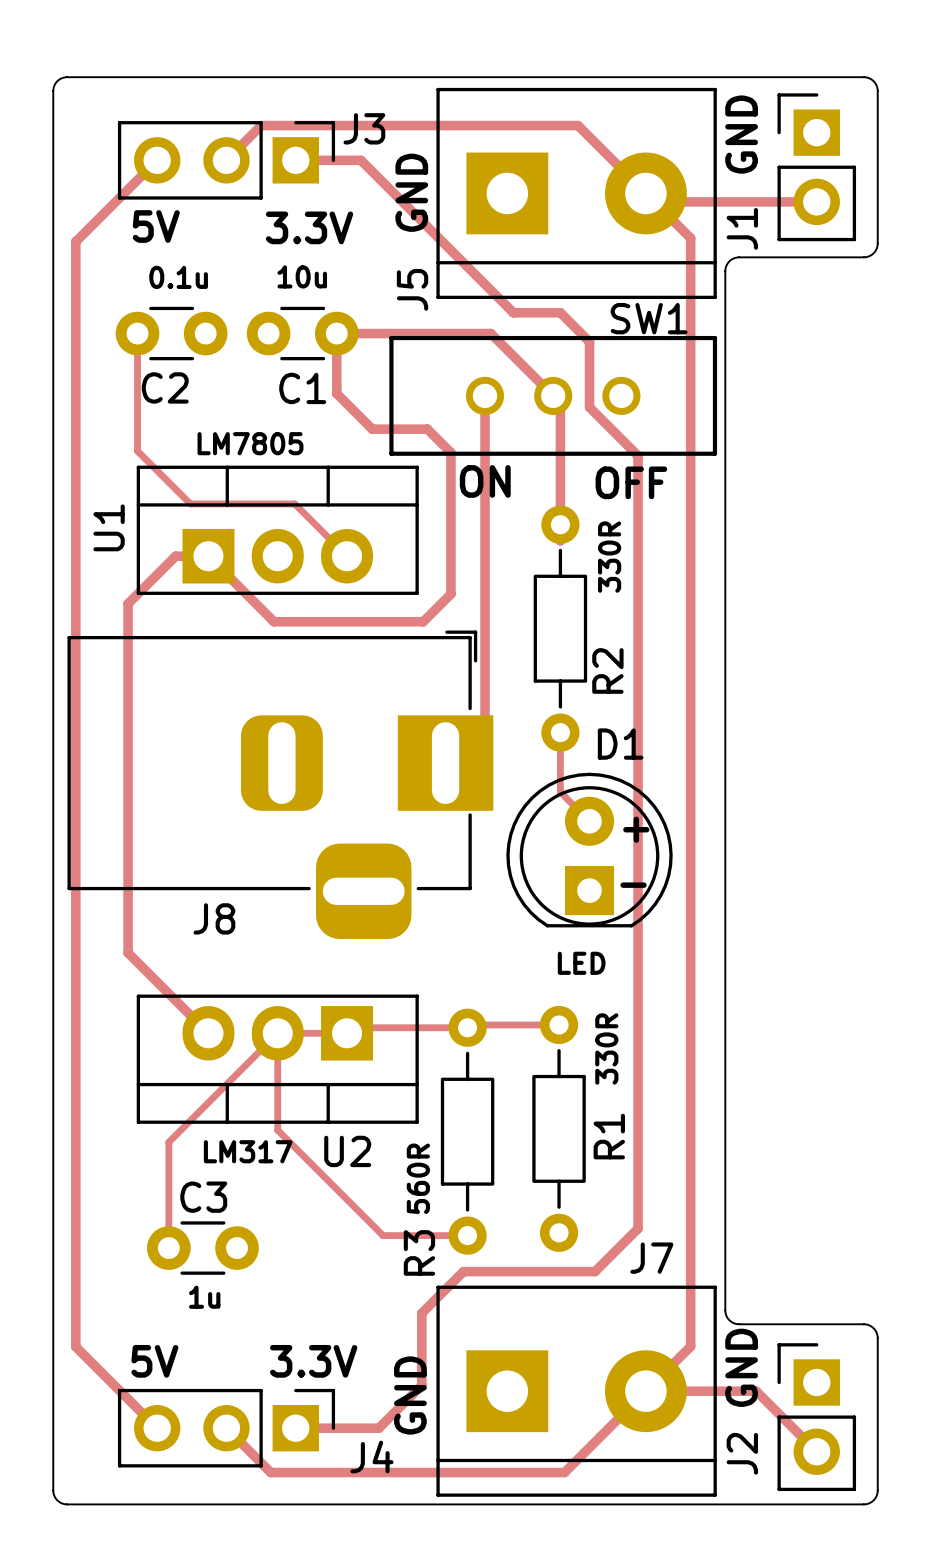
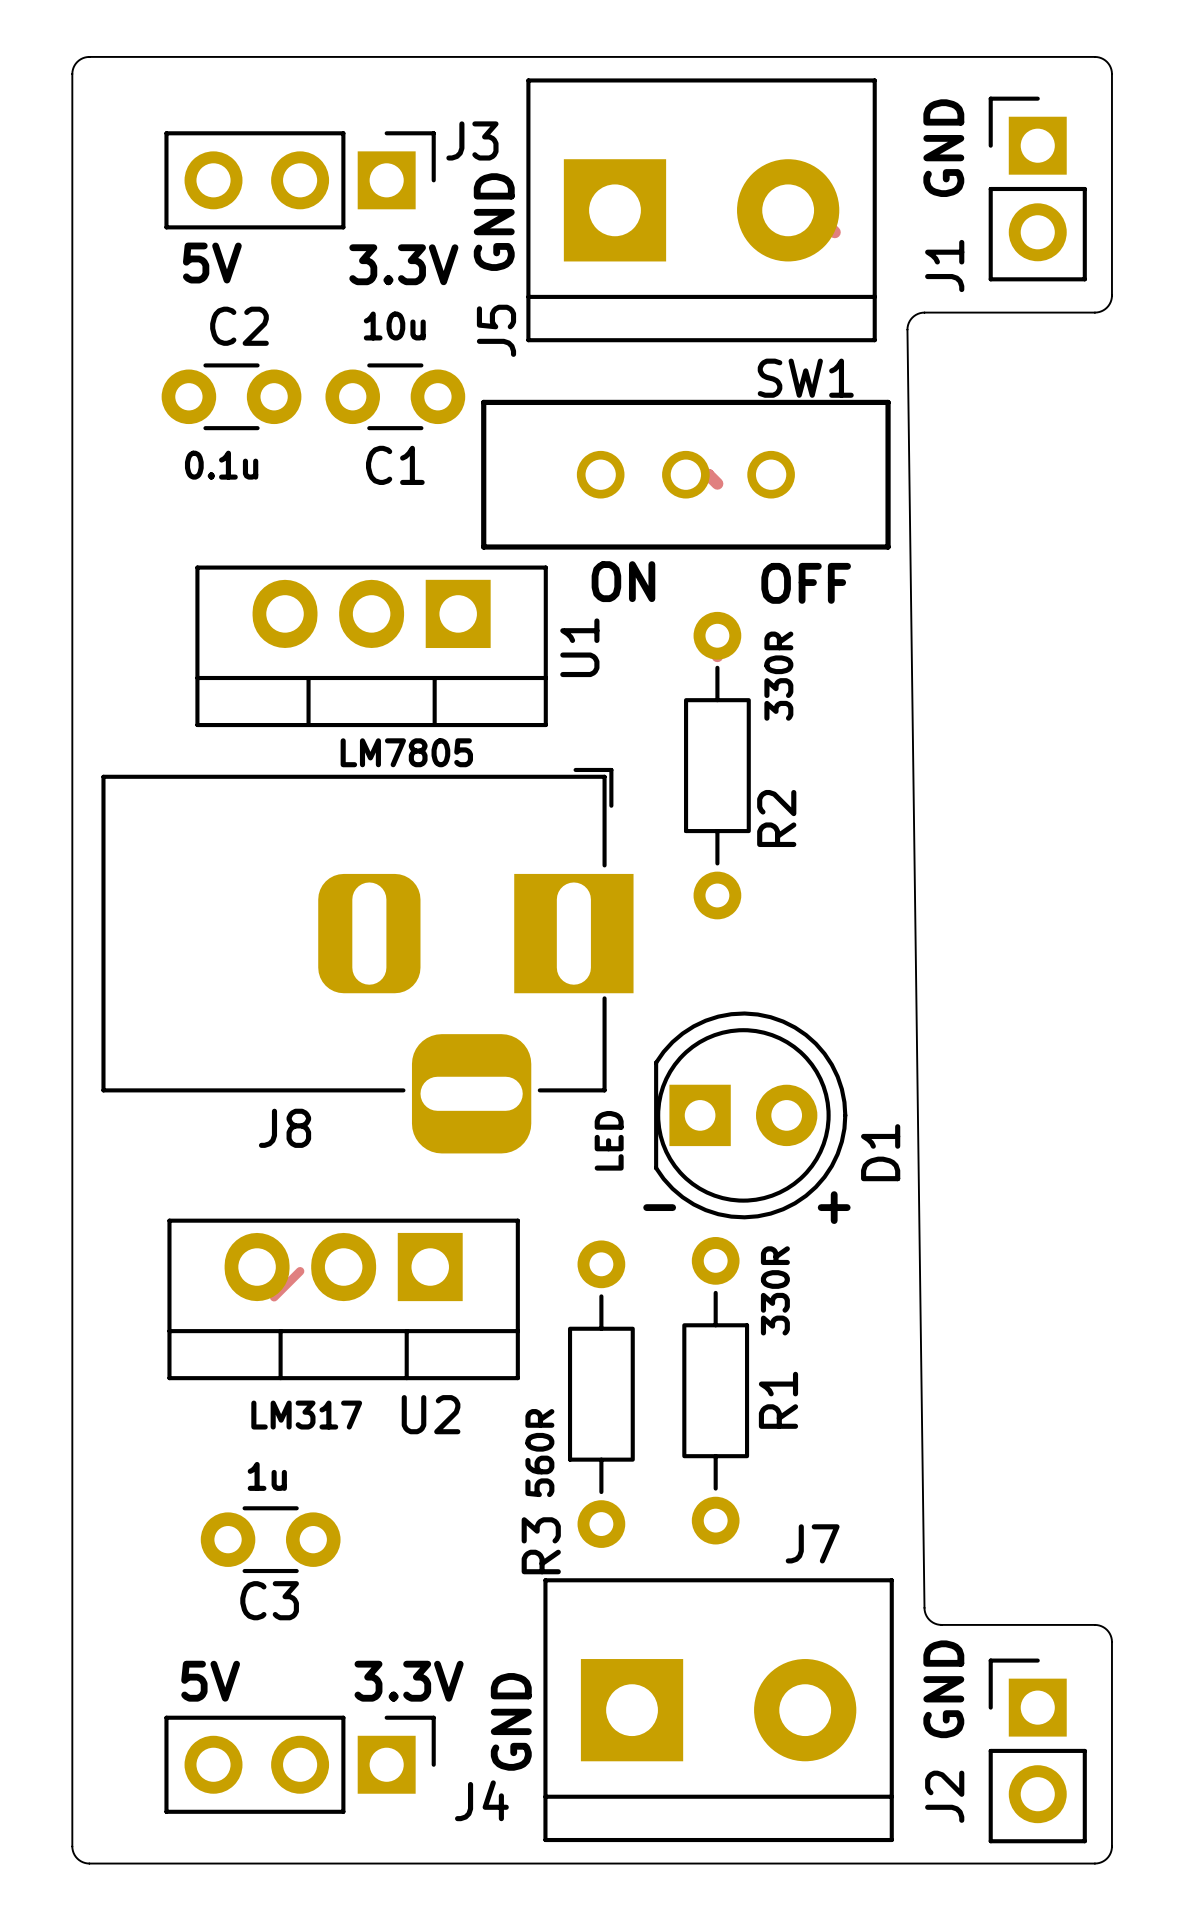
board edge: (67, 77) (863, 77) (870, 79) (875, 84) (877, 91) (877, 243) (874, 251) (863, 257) (737, 257) (728, 262) (725, 271) (725, 1312) (729, 1320) (737, 1324) (863, 1324) (874, 1329) (877, 1338) (877, 1490) (875, 1497) (870, 1502) (863, 1504) (67, 1504) (60, 1502) (55, 1497) (53, 1490) (53, 91) (57, 81) (67, 77) -> (89, 56) (77, 61) (72, 73) (72, 1846) (74, 1855) (80, 1861) (89, 1863) (1094, 1863) (1103, 1861) (1109, 1855) (1111, 1846) (1111, 1641) (1108, 1631) (1101, 1626) (1094, 1624) (939, 1624) (929, 1619) (924, 1610) (907, 329) (910, 319) (922, 312) (1094, 312) (1103, 310) (1108, 305) (1111, 295) (1111, 73) (1109, 65) (1103, 59) (1094, 56) (89, 56)
track: (157, 160) (75, 241) (75, 1346) (157, 1428) -> none
track: (226, 160) (261, 125) (578, 125) (645, 193) -> none
track: (295, 160) (360, 160) (513, 312) (560, 312) (589, 341) (589, 407) (638, 455) (638, 1228) (595, 1271) (463, 1271) (421, 1313) (421, 1385) (378, 1428) (316, 1428) -> none
text position: GND (411, 192) -> GND (494, 222)
J5 position: (576, 193) -> (701, 210)
track: (816, 201) (654, 201) (690, 238) (690, 1346) (564, 1472) (270, 1472) (226, 1428) -> none
C2 value position: 0.1u (178, 277) -> 0.1u (221, 465)
track: (137, 333) (137, 451) (190, 503) (294, 503) (347, 556) -> none
track: (336, 333) (490, 333) (553, 395) -> none
track: (336, 342) (336, 393) (372, 429) (427, 429) (450, 452) (450, 594) (423, 621) (274, 621) (208, 556) -> none
C2 name position: C2 (165, 387) -> C2 (239, 326)
track: (485, 395) (485, 723) -> none
SW1 position: (553, 395) -> (685, 474)
track: (560, 403) (560, 524) -> none
U1 rotation: 0° (277, 530) -> 180° (371, 646)
track: (208, 556) (175, 556) (128, 603) (128, 952) (208, 1033) -> none
track: (560, 732) (560, 792) (589, 821) -> none
D1 name position: D1 (620, 744) -> D1 (880, 1152)
D1 footprint: [506, 772, 673, 928] -> [654, 1011, 848, 1220]
text position: + (636, 829) -> + (834, 1207)
text position: - (633, 885) -> - (659, 1207)
D1 value position: LED (581, 963) -> LED (609, 1140)
track: (470, 1024) (559, 1024) -> none
track: (352, 1027) (467, 1027) -> none
track: (295, 1033) (330, 1033) -> none
U2 position: (277, 1059) -> (343, 1299)
C3 name position: C3 (203, 1197) -> C3 (269, 1600)
track: (467, 1235) (383, 1235) (277, 1130) (277, 1033) (168, 1142) (168, 1248) -> none
C3 value position: 1u (204, 1297) -> 1u (267, 1476)
J7 position: (576, 1391) -> (718, 1710)
track: (645, 1391) (756, 1391) (816, 1451) -> none
text position: GND (410, 1395) -> GND (511, 1721)

